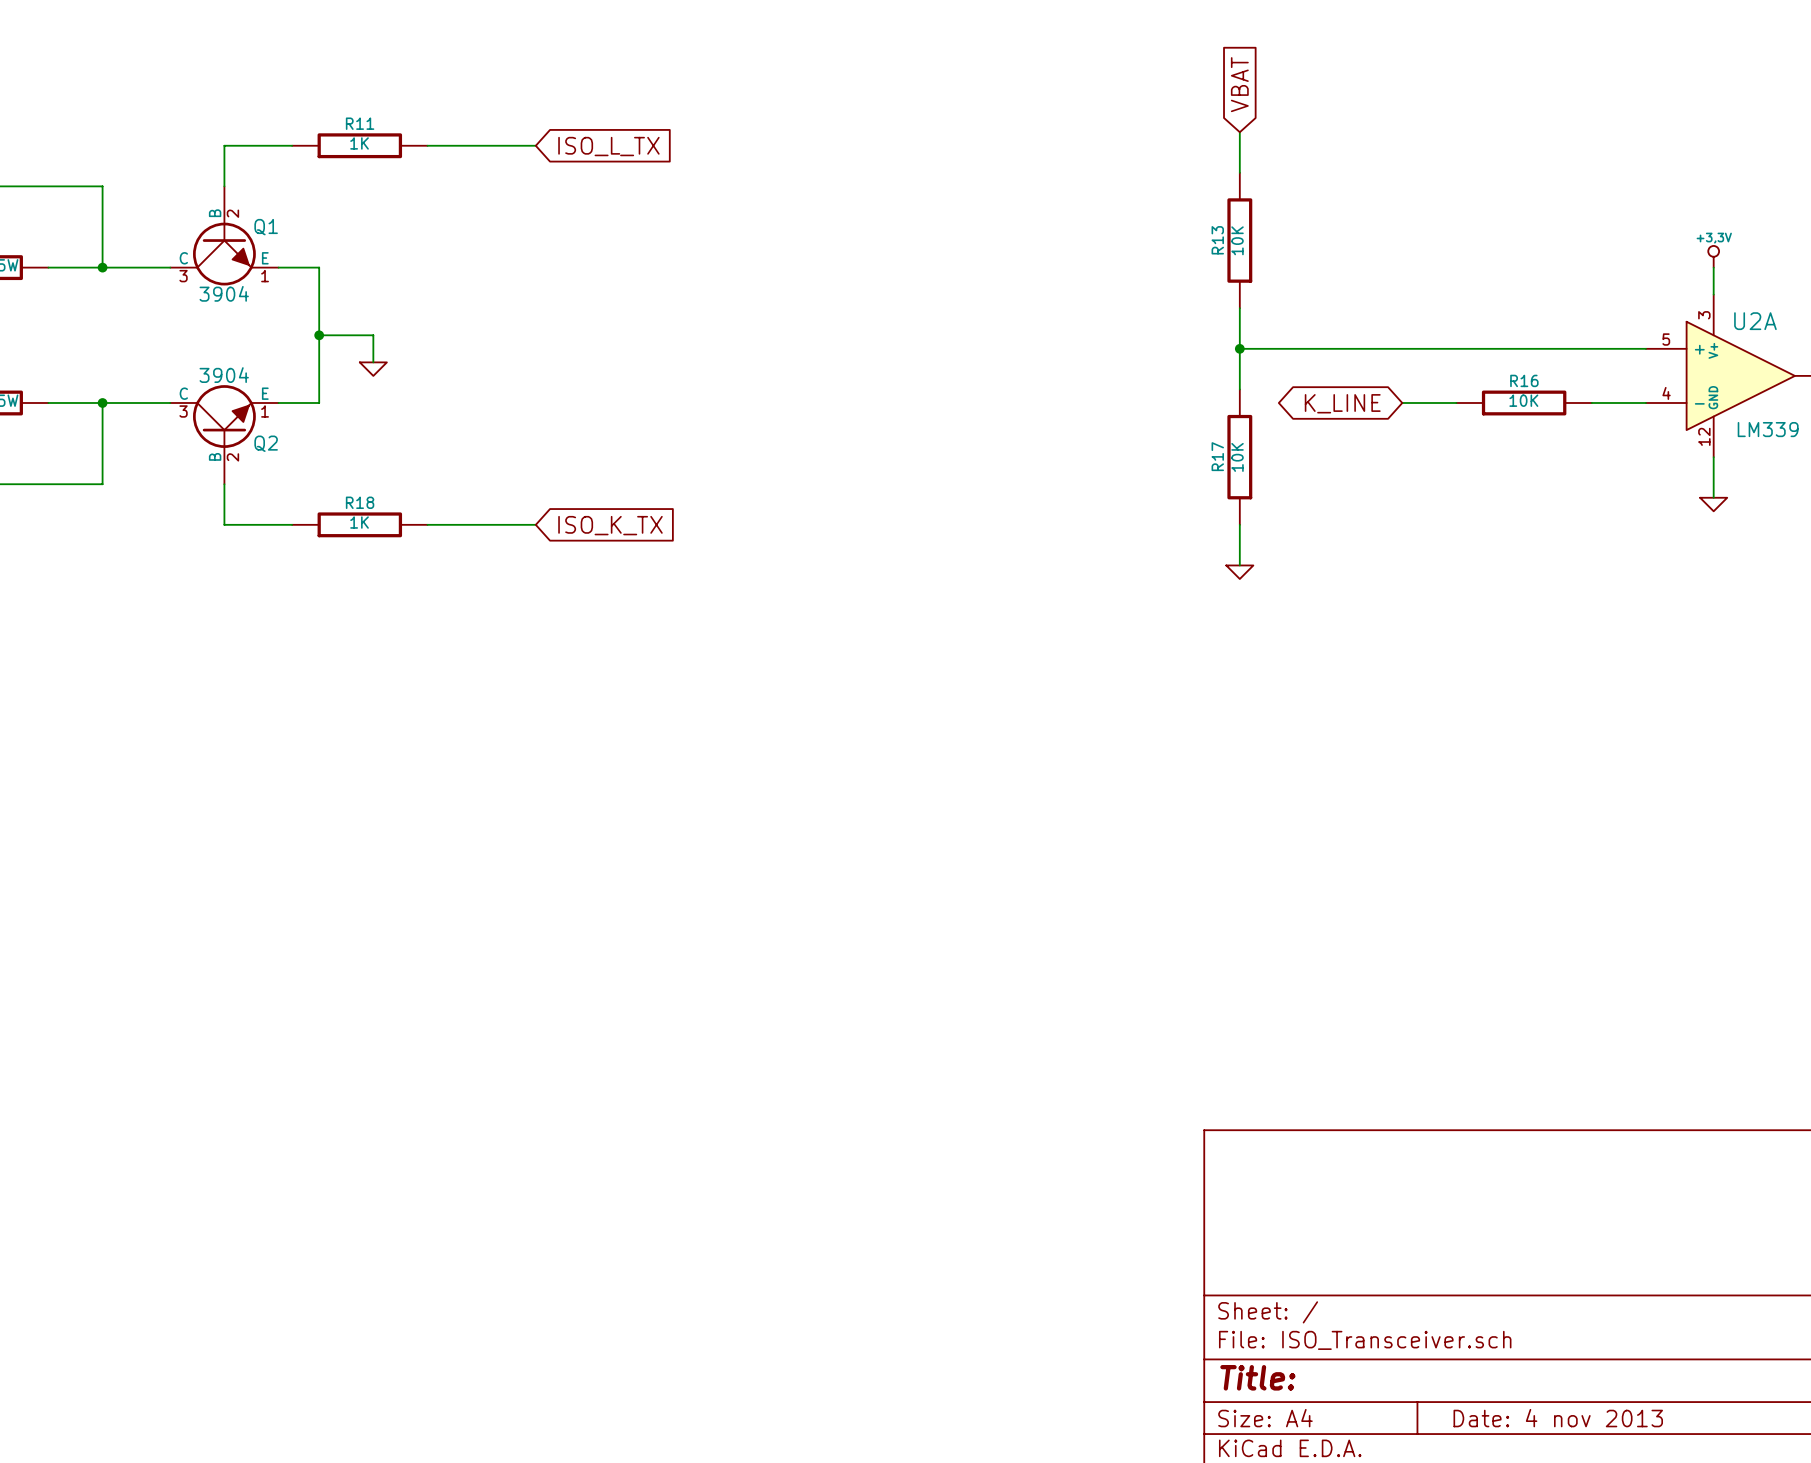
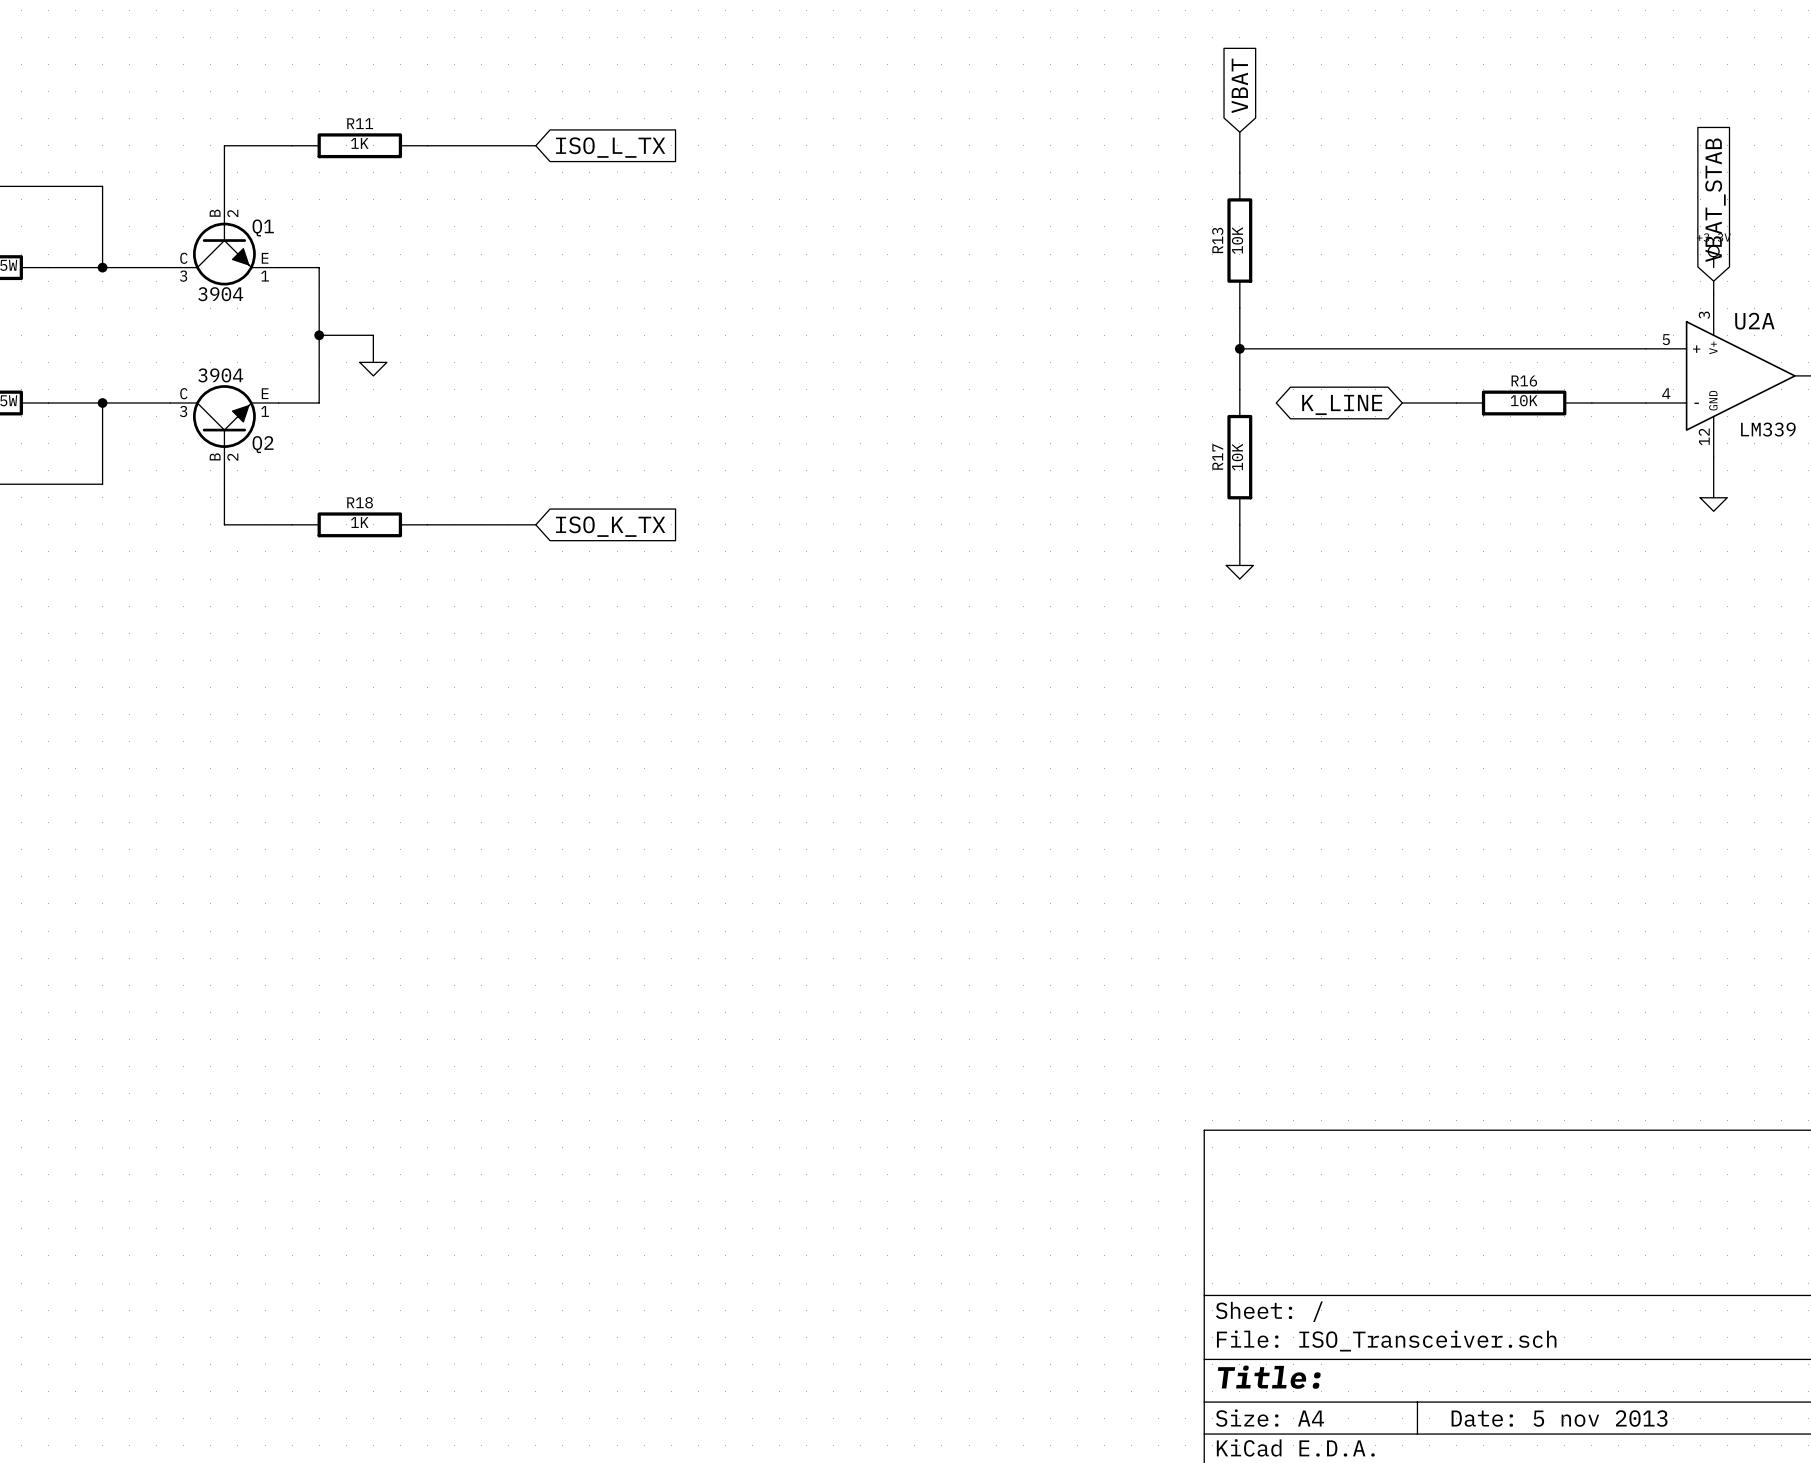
global label: none -> VBAT_STAB (1715, 200)
wire: (1713, 267) (1713, 281) -> none
title block: Date: 4 nov 2013 (1558, 1418) -> Date: 5 nov 2013 (1559, 1418)

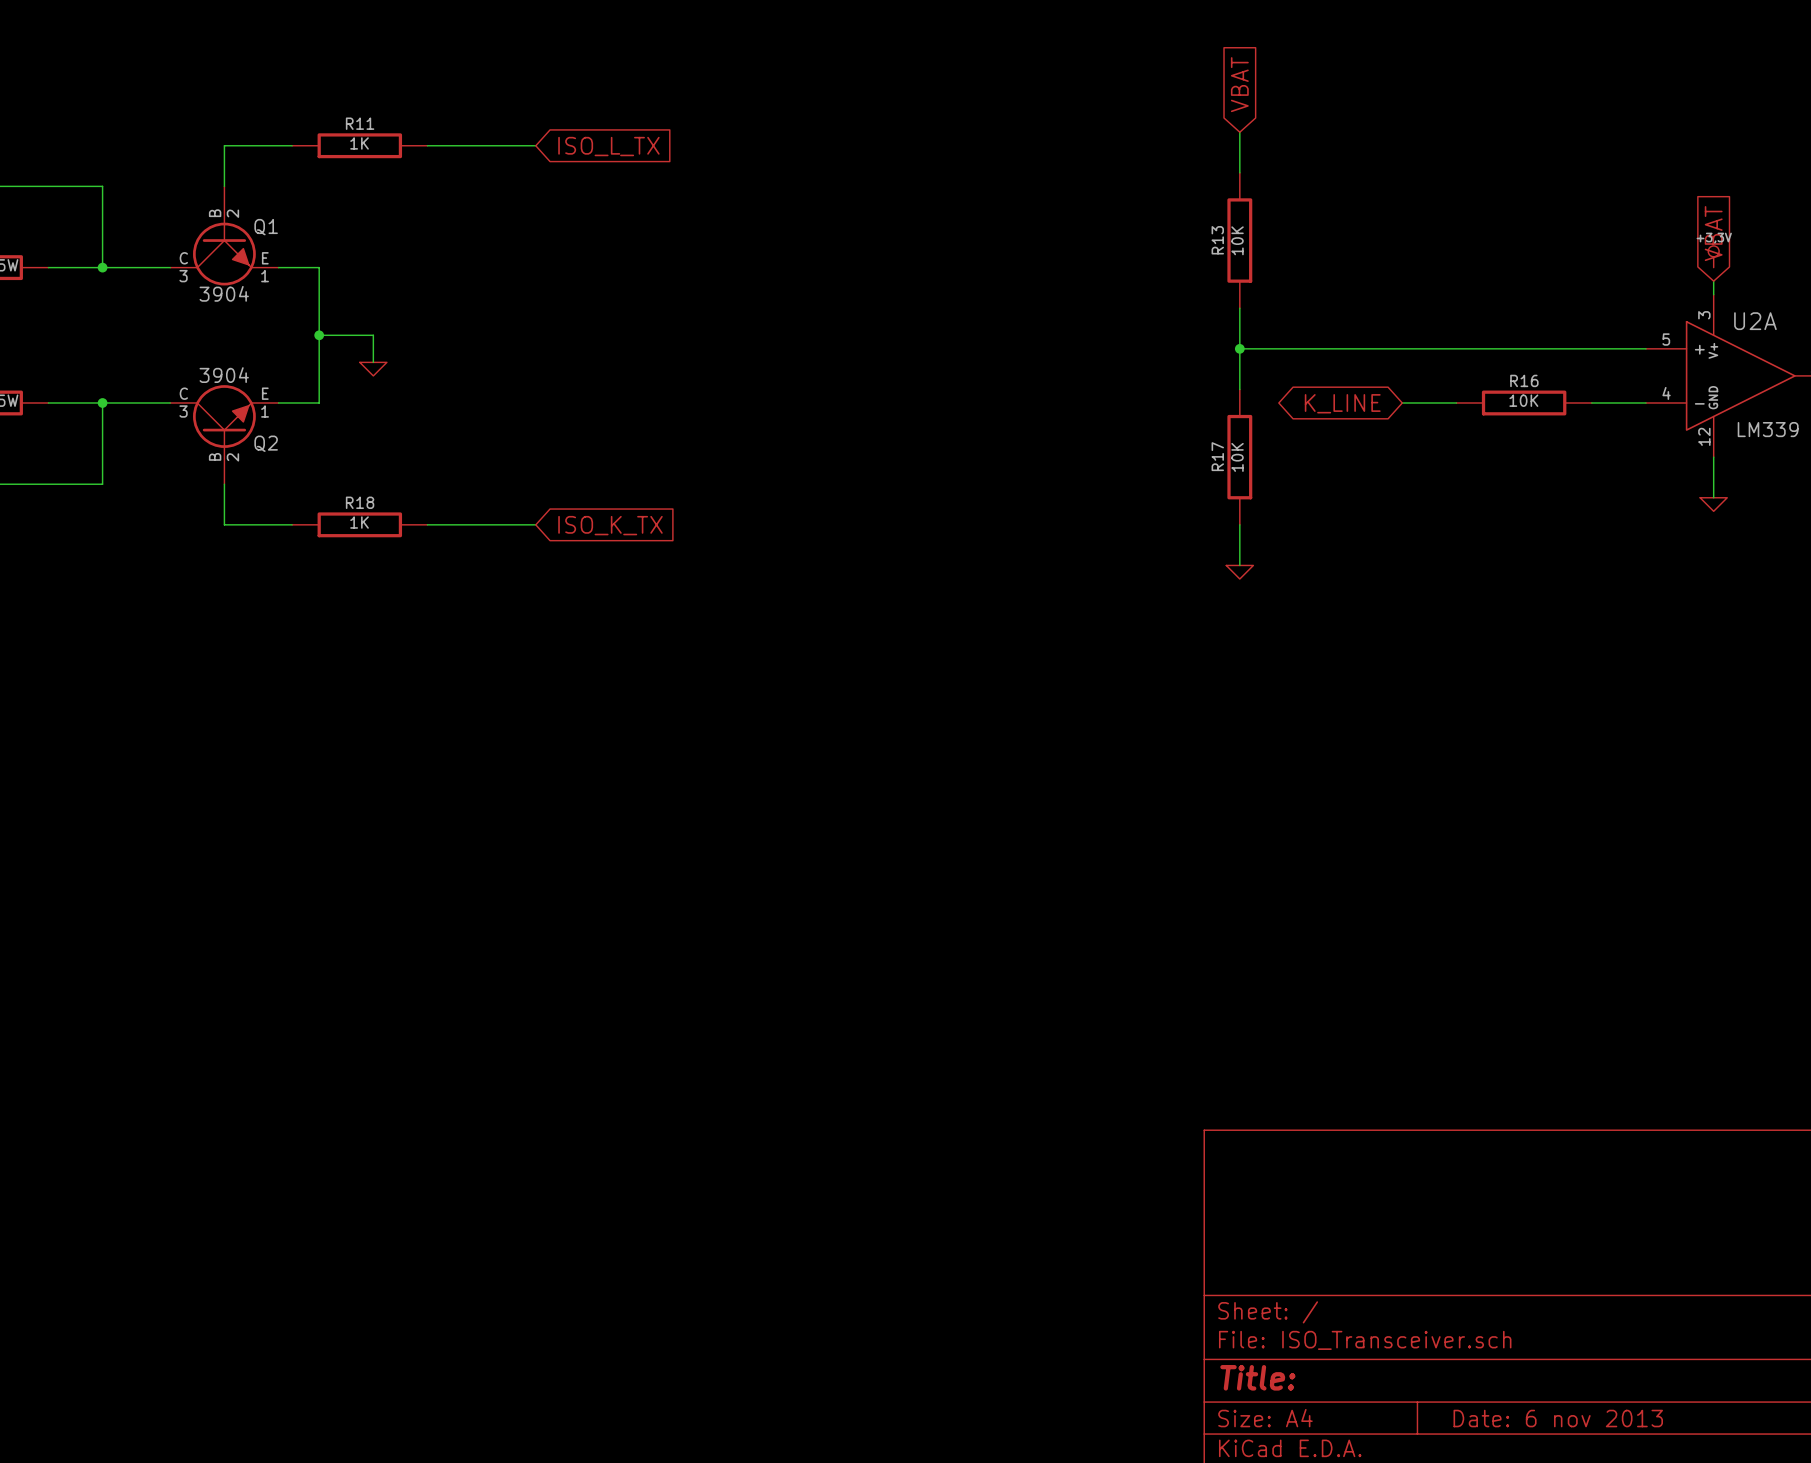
global label: VBAT_STAB (1715, 200) -> VBAT (1713, 233)
title block: Date: 5 nov 2013 (1559, 1418) -> Date: 6 nov 2013 (1558, 1418)

